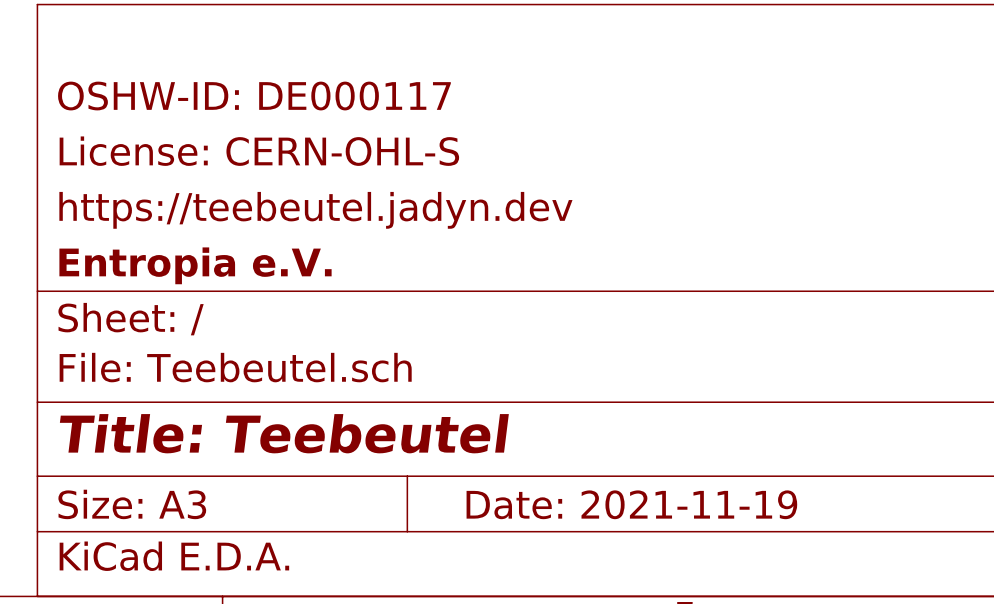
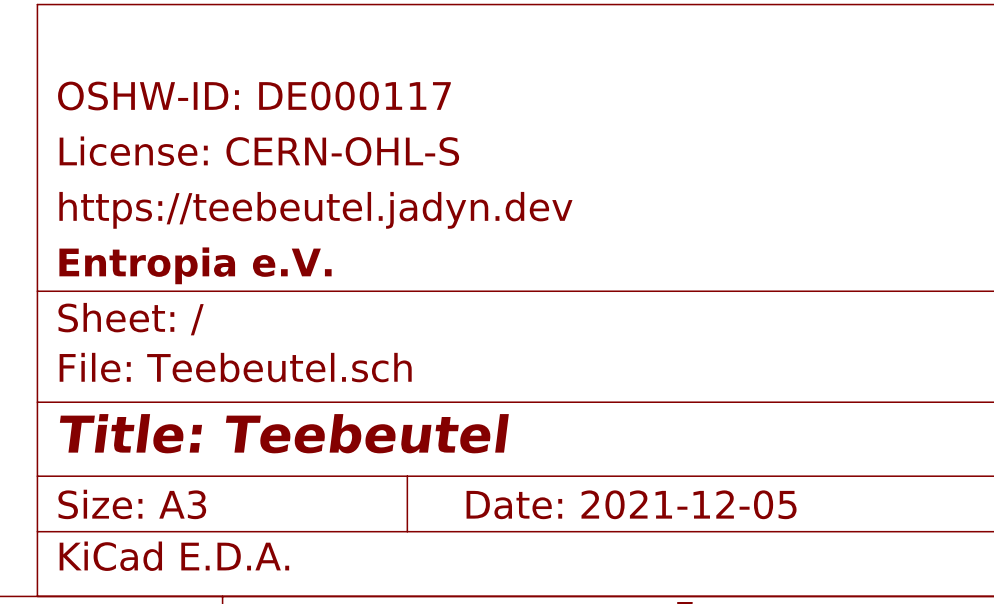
title block: Date: 2021-11-19 (631, 504) -> Date: 2021-12-05 (631, 504)

